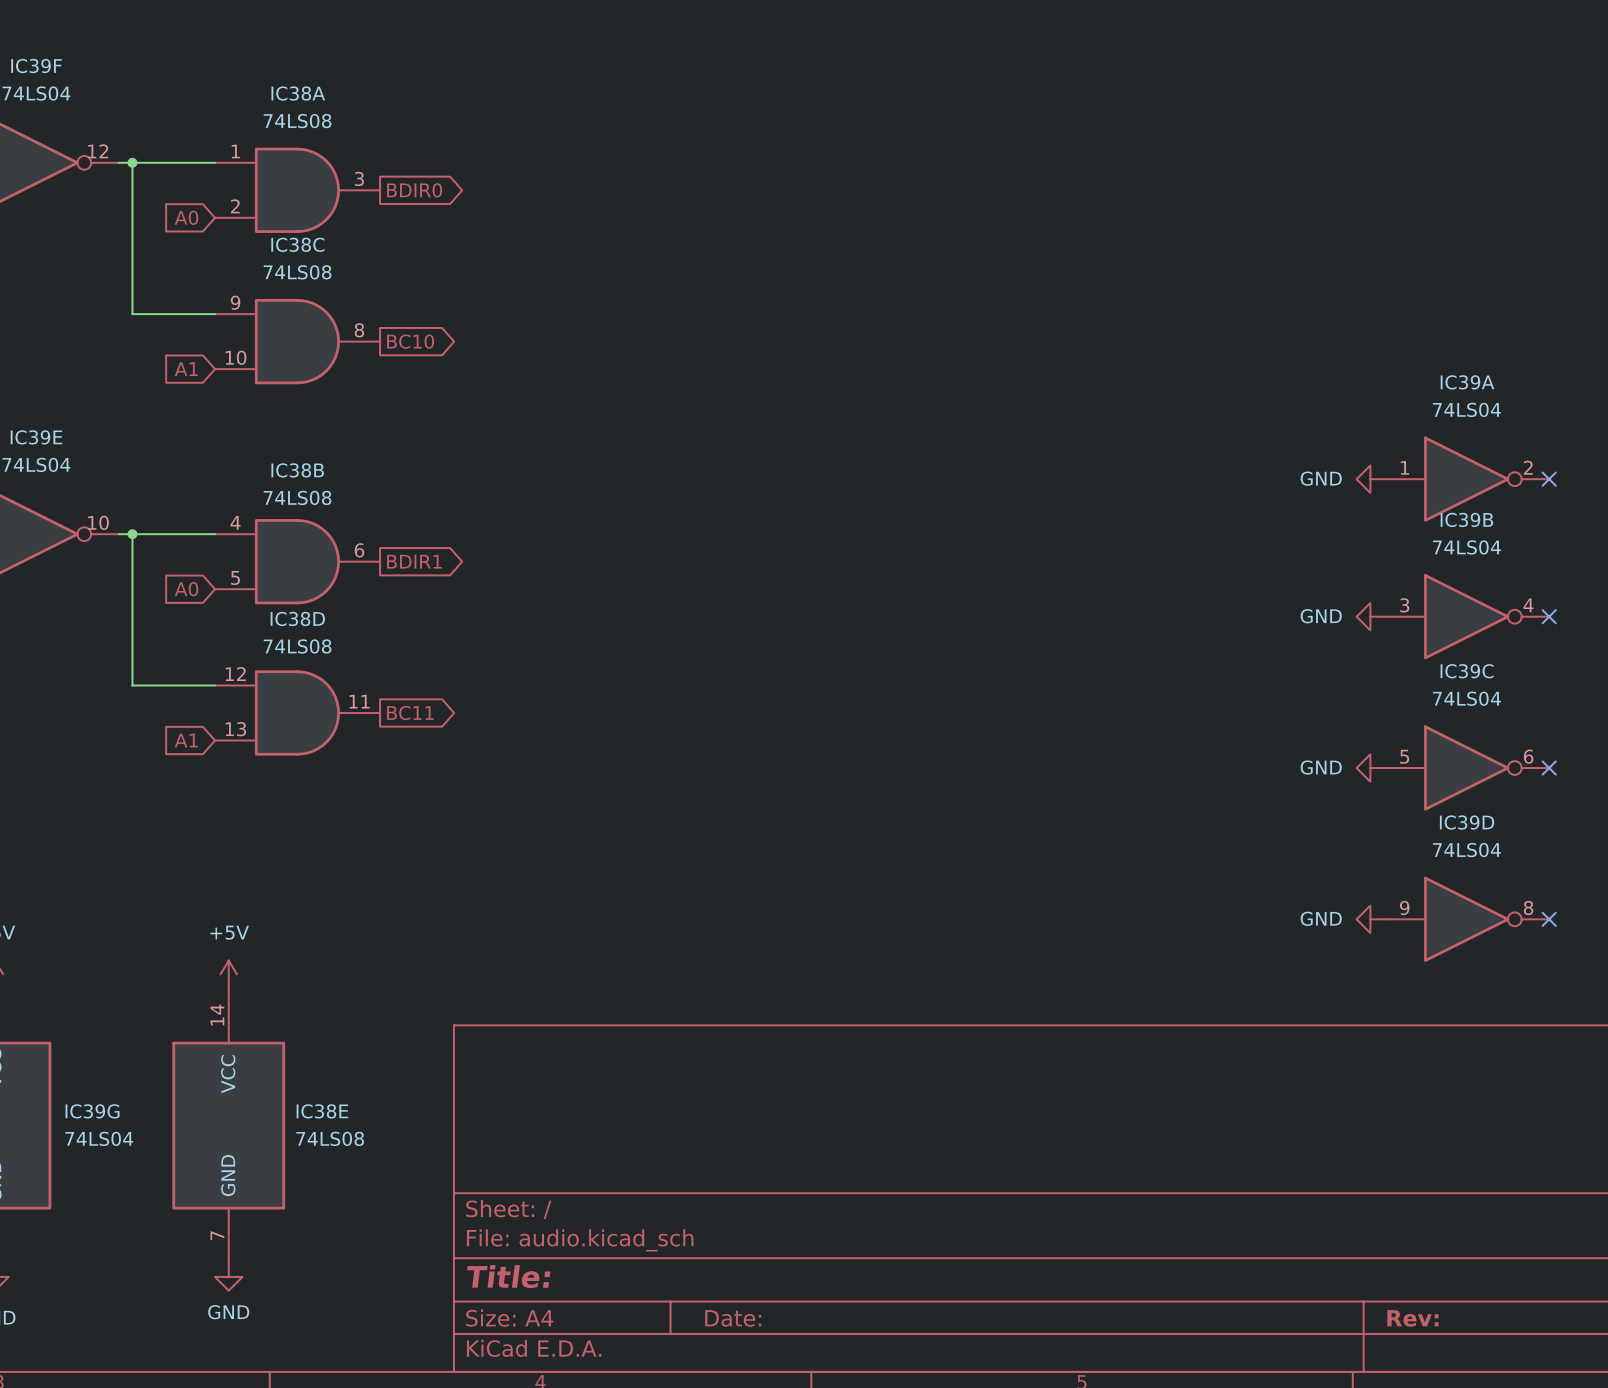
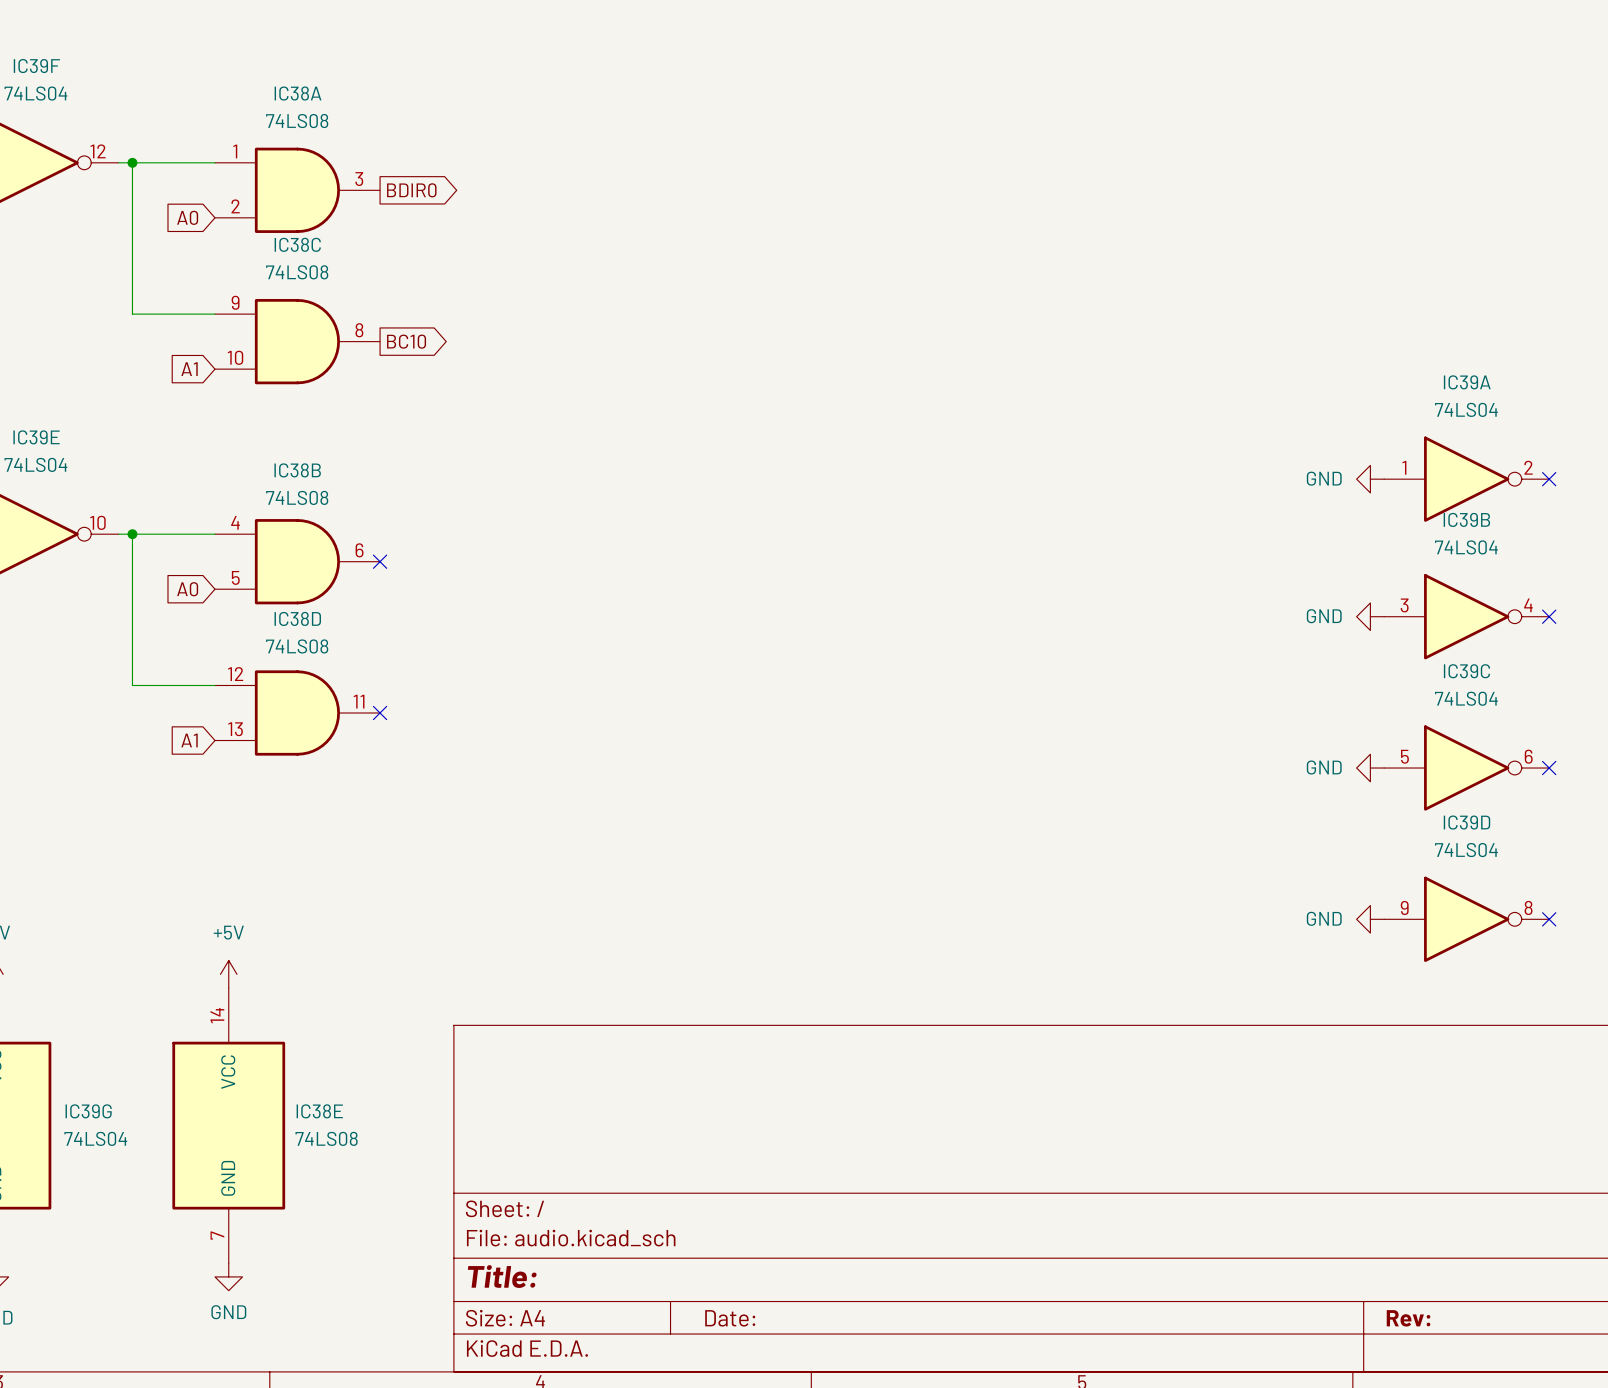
no-connect mark: none -> (380, 561)
global label: BDIR1 (414, 561) -> none
no-connect mark: none -> (380, 713)
global label: BC11 (410, 713) -> none

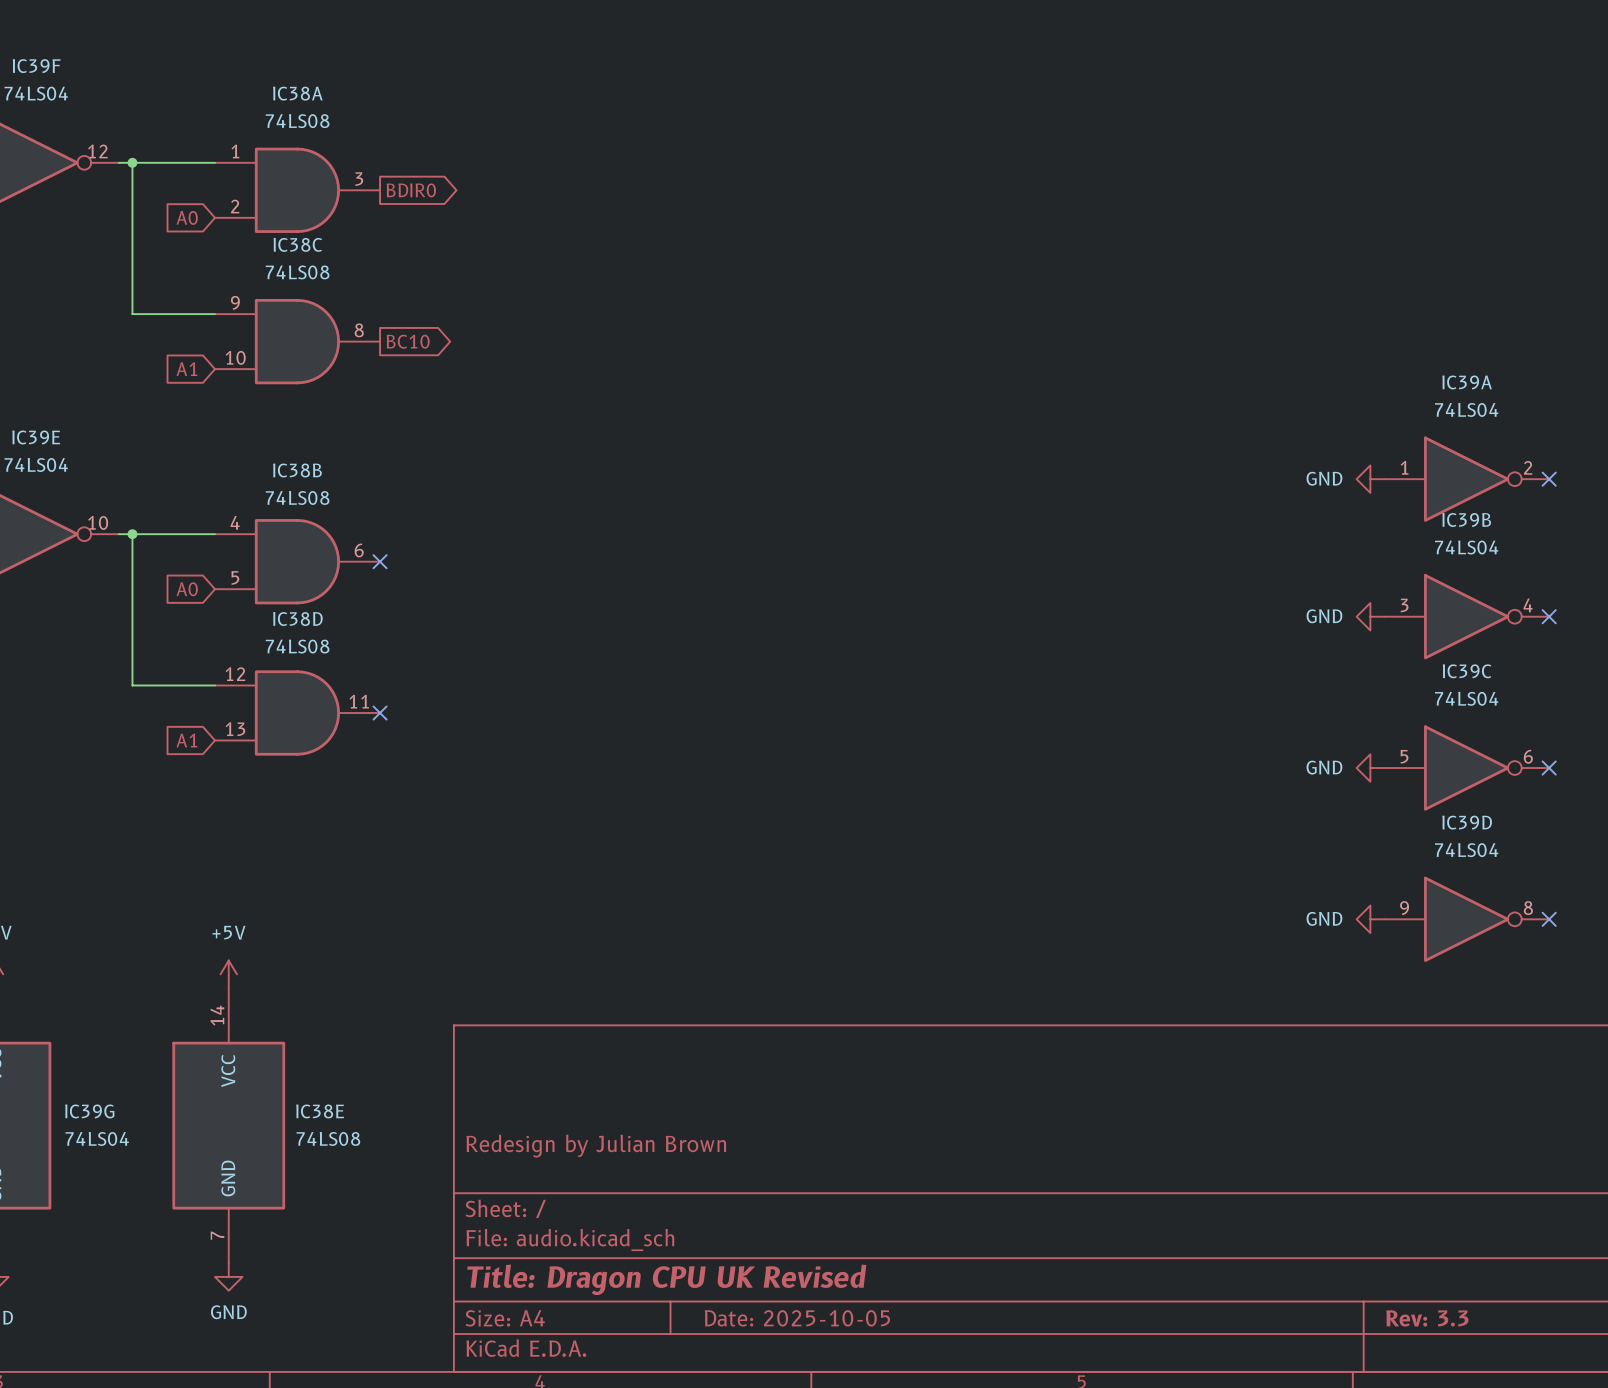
title block: none -> Redesign by Julian Brown (596, 1146)
title block: Title: (502, 1276) -> Title: Dragon CPU UK Revised (666, 1279)
title block: Date: (730, 1318) -> Date: 2025-10-05 (797, 1318)
title block: Rev: (1408, 1318) -> Rev: 3.3 (1427, 1318)

